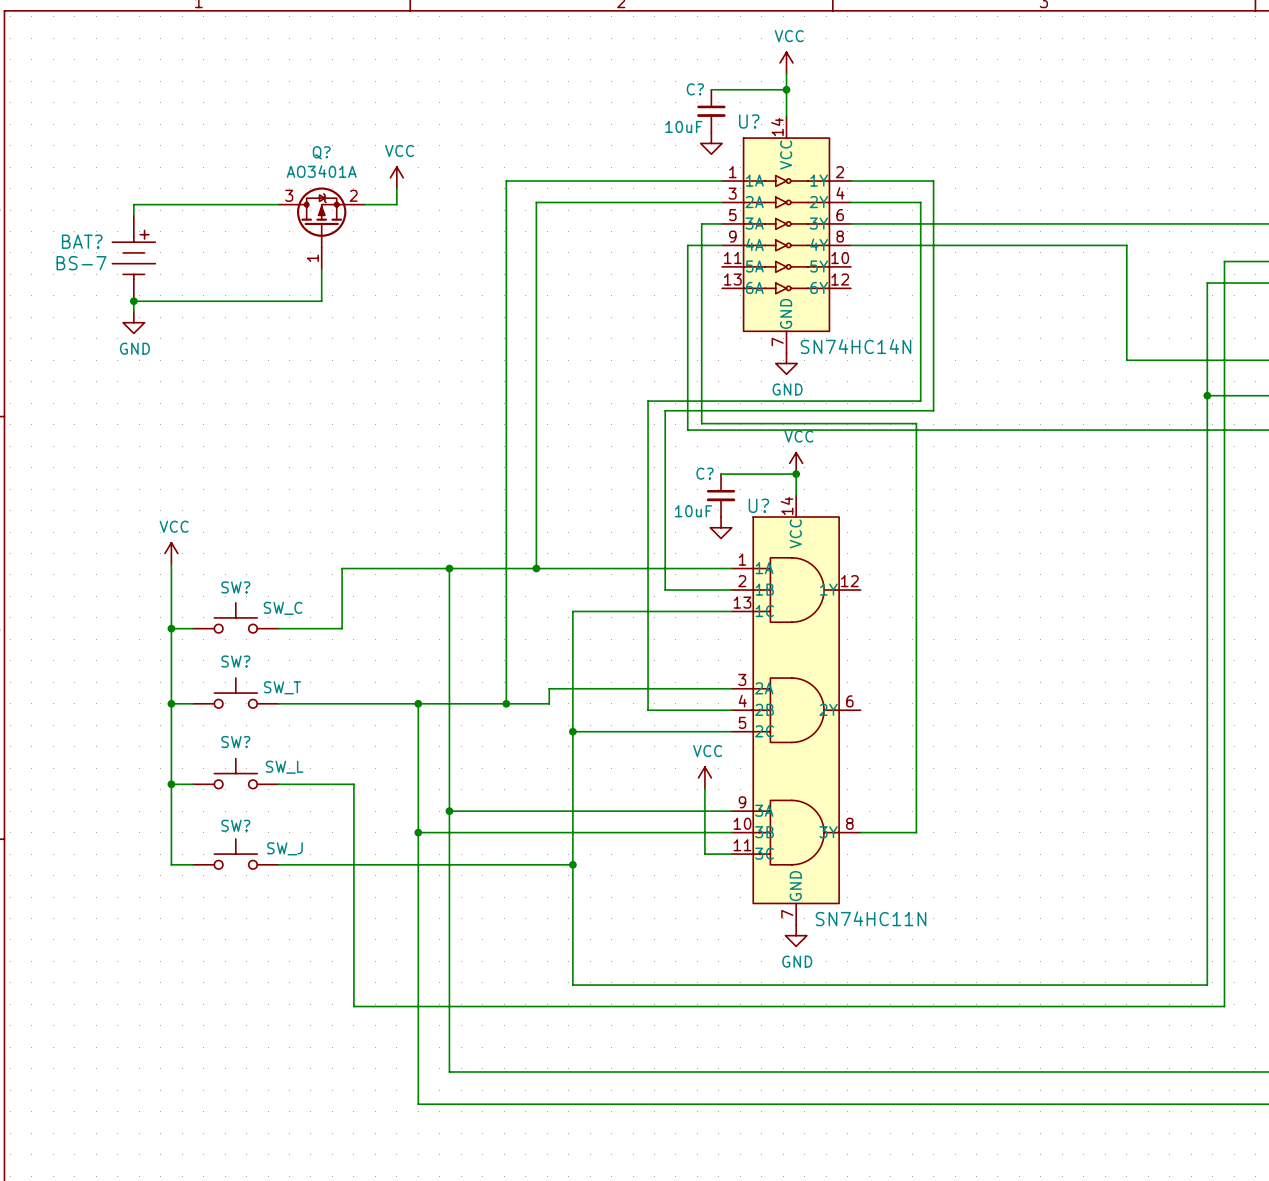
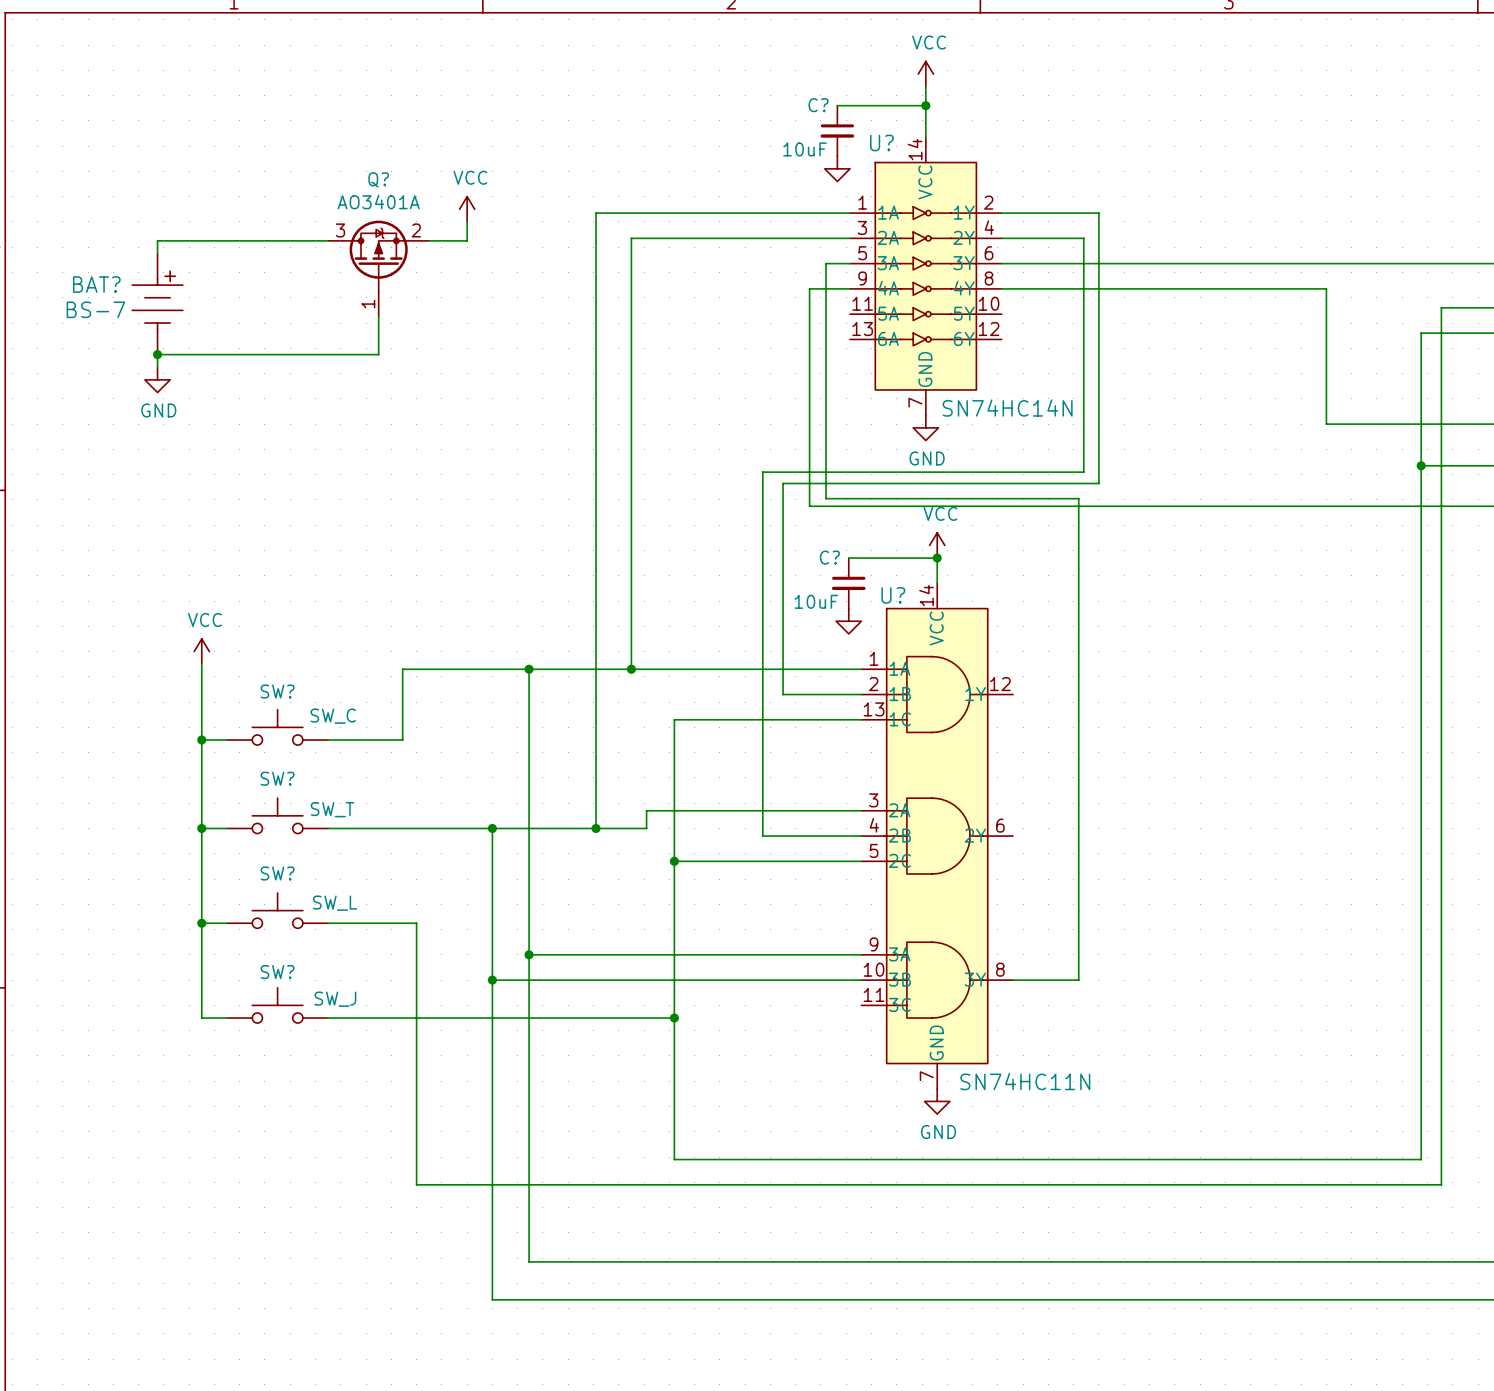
power symbol: VCC (704, 777) -> none
wire: (704, 788) (704, 854) (731, 854) -> none

